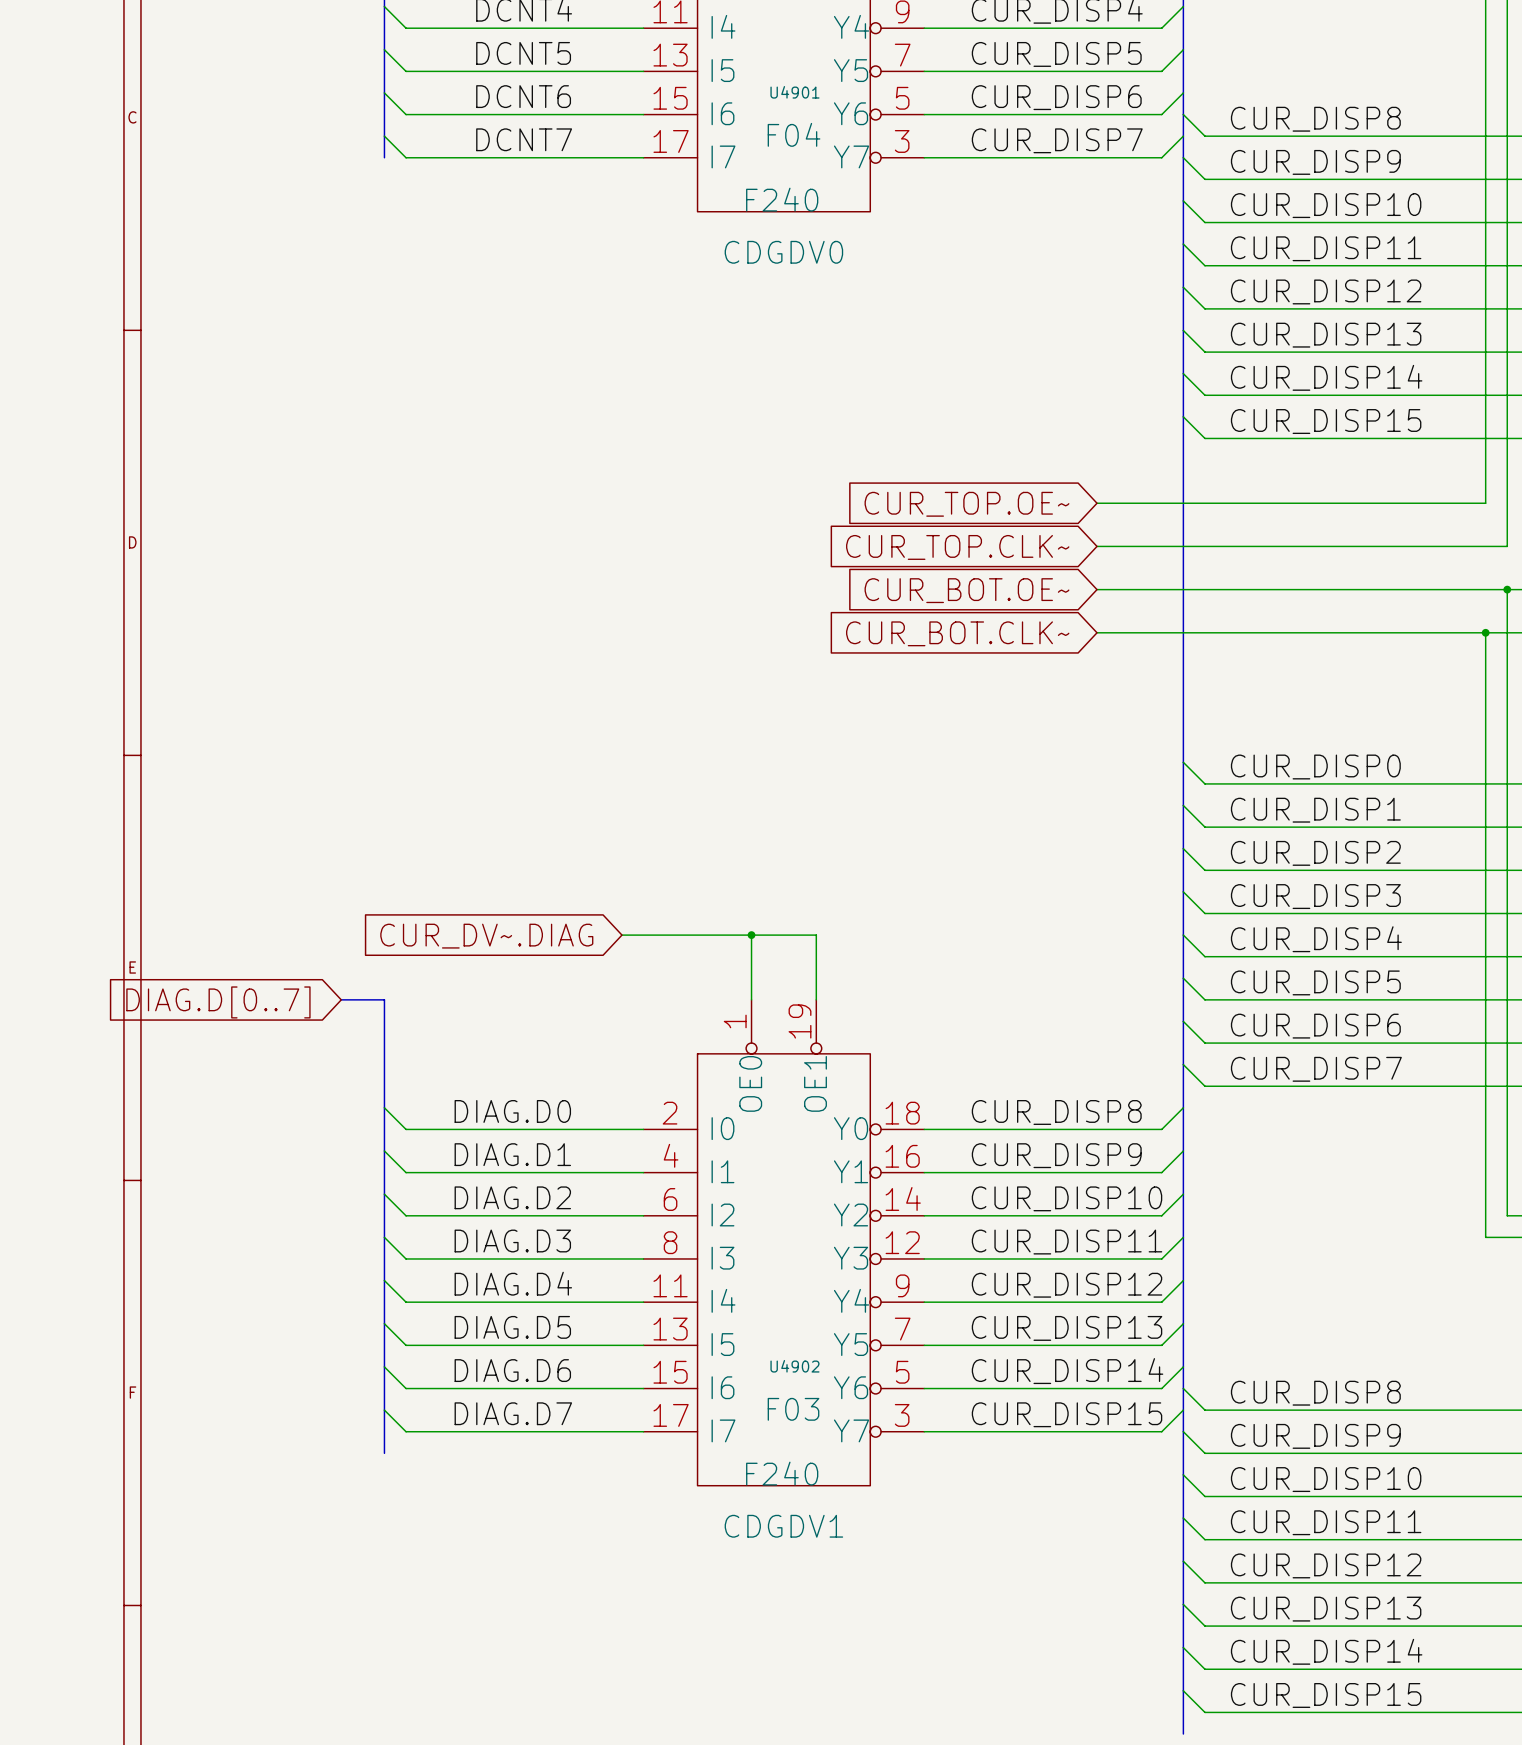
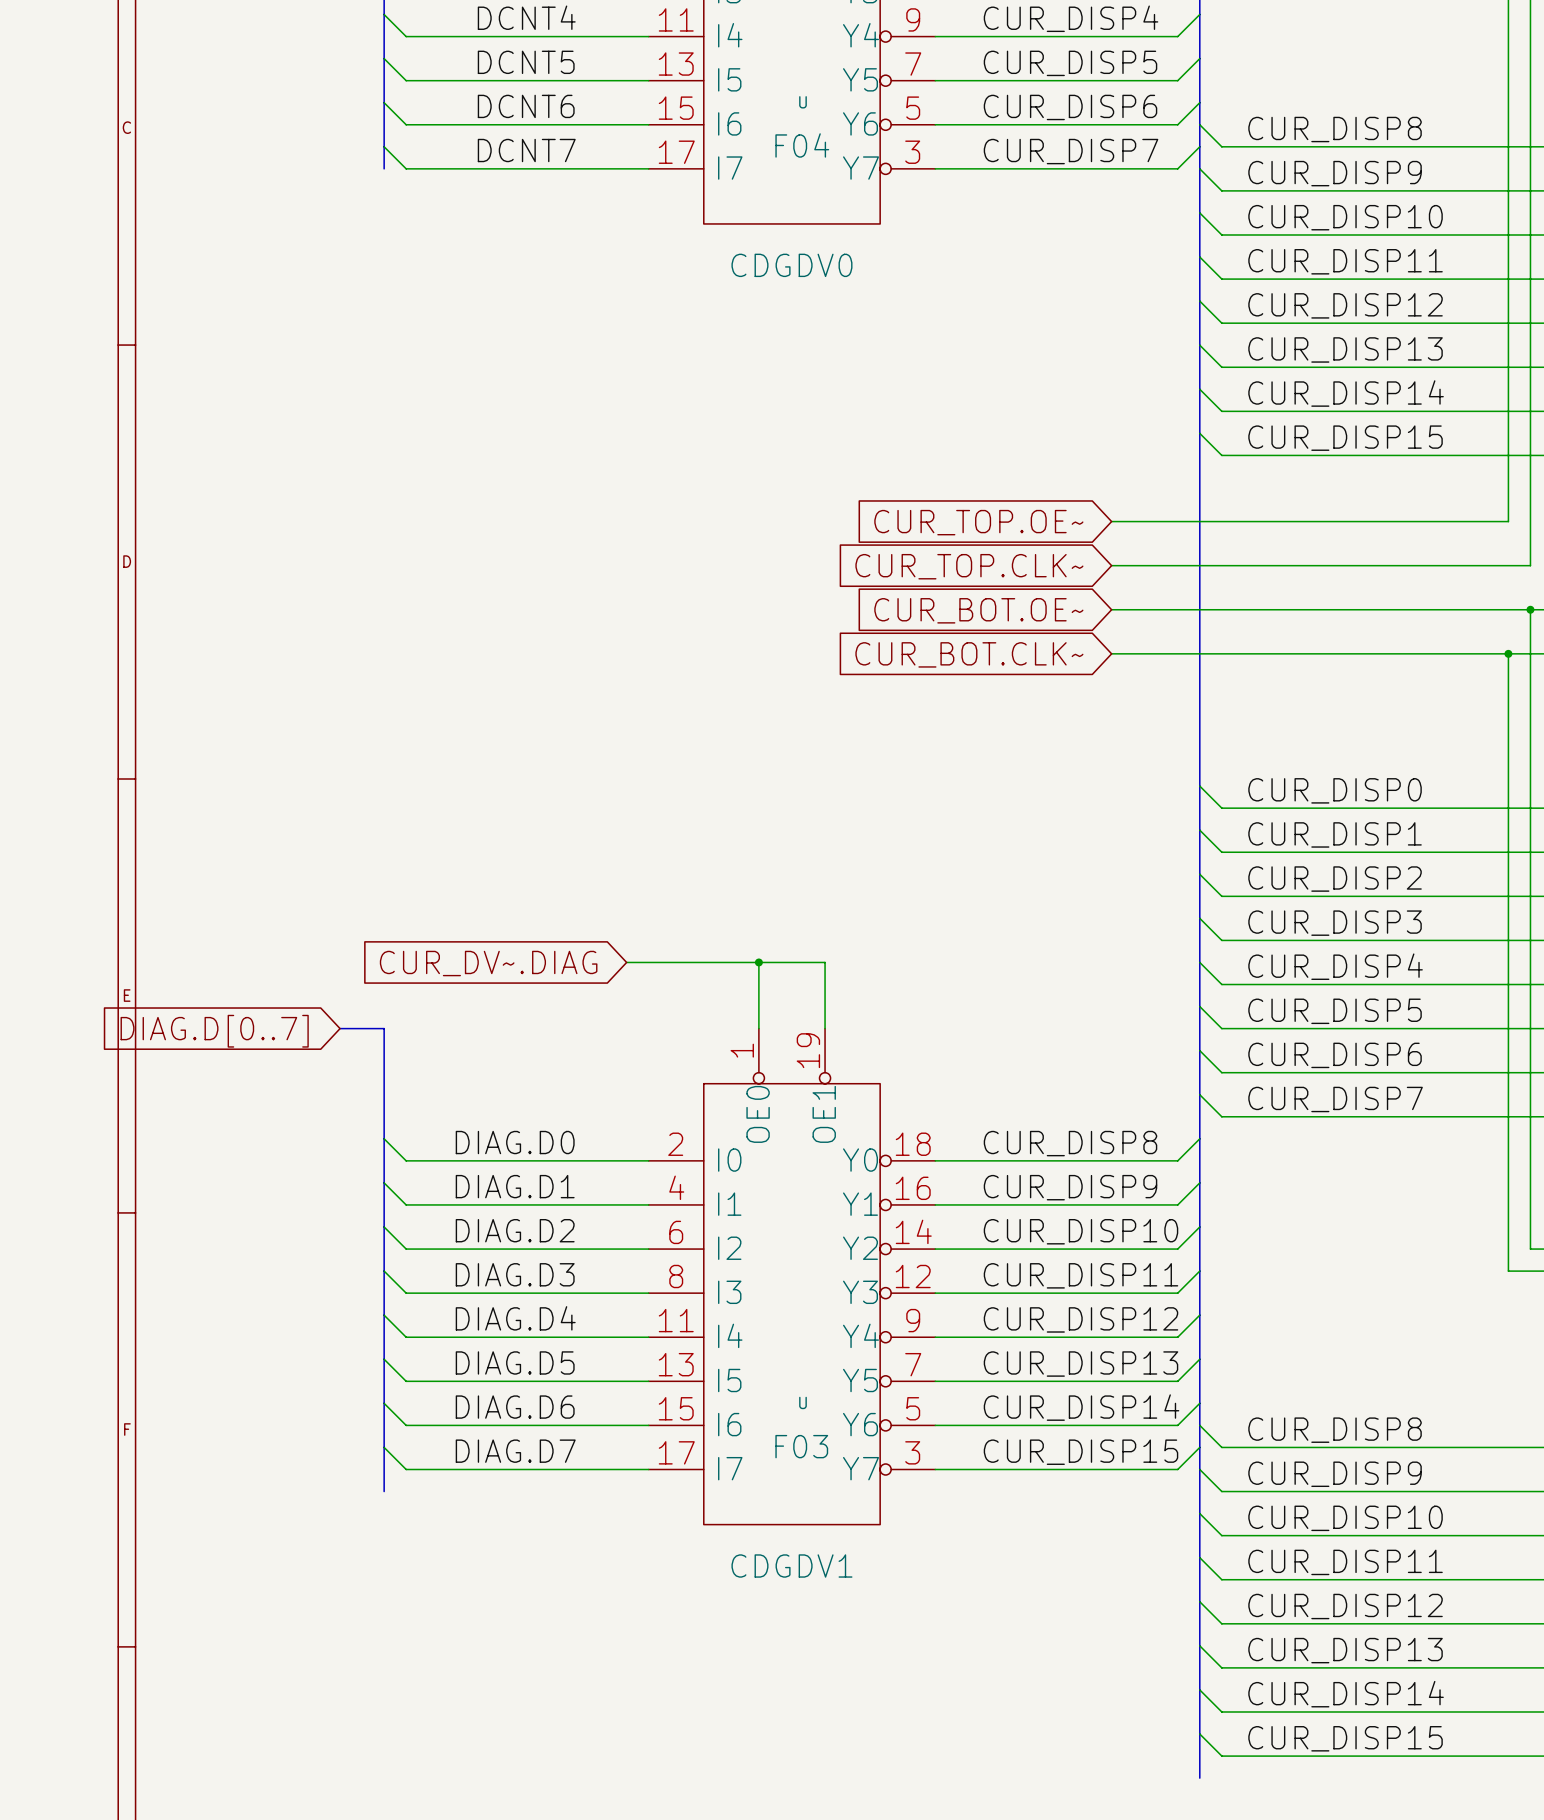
U4901 name: U4901 (794, 92) -> U (802, 102)
U4901 value: F240 (782, 199) -> none
U4902 name: U4902 (794, 1366) -> U (802, 1402)
U4902 value: F240 (782, 1473) -> none

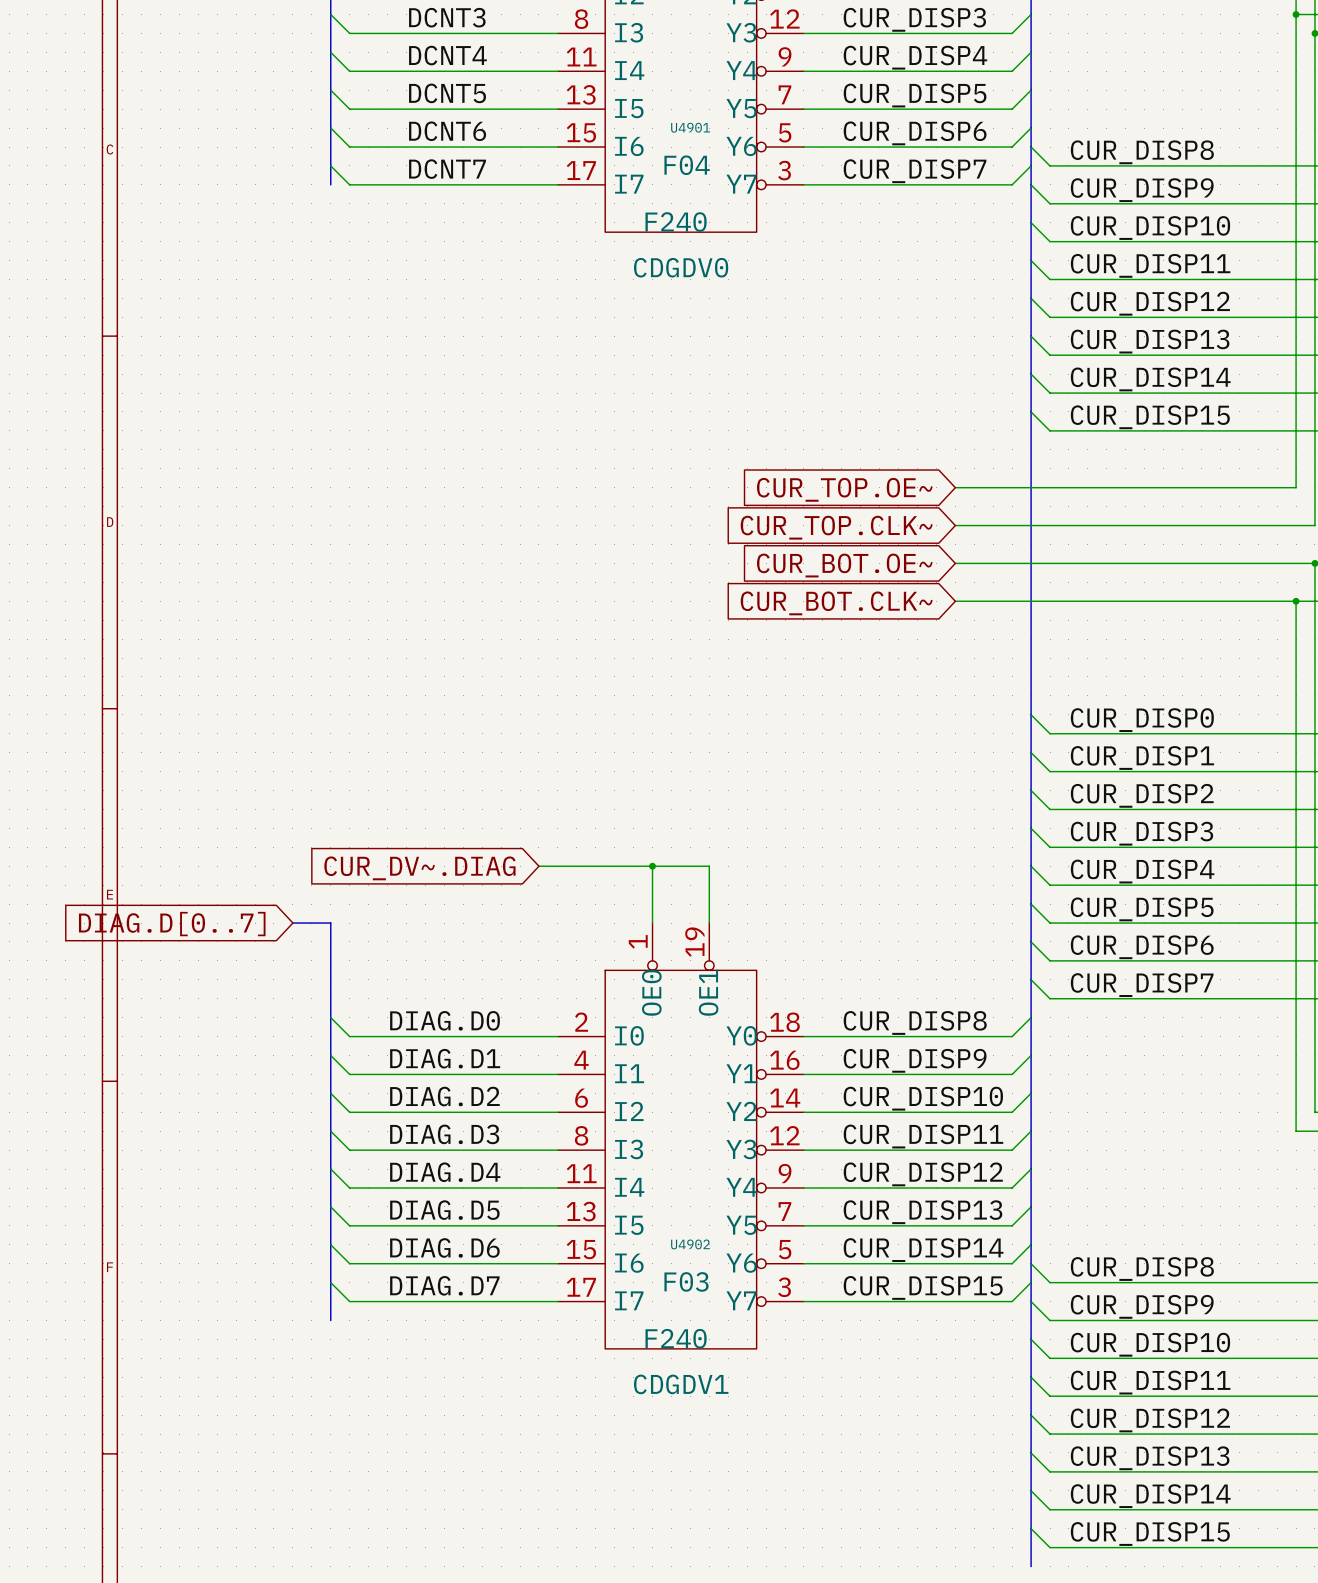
U name: U (802, 102) -> U4901 (690, 127)
U value: none -> F240 (676, 222)
U name: U (802, 1402) -> U4902 (690, 1244)
U value: none -> F240 (676, 1338)

